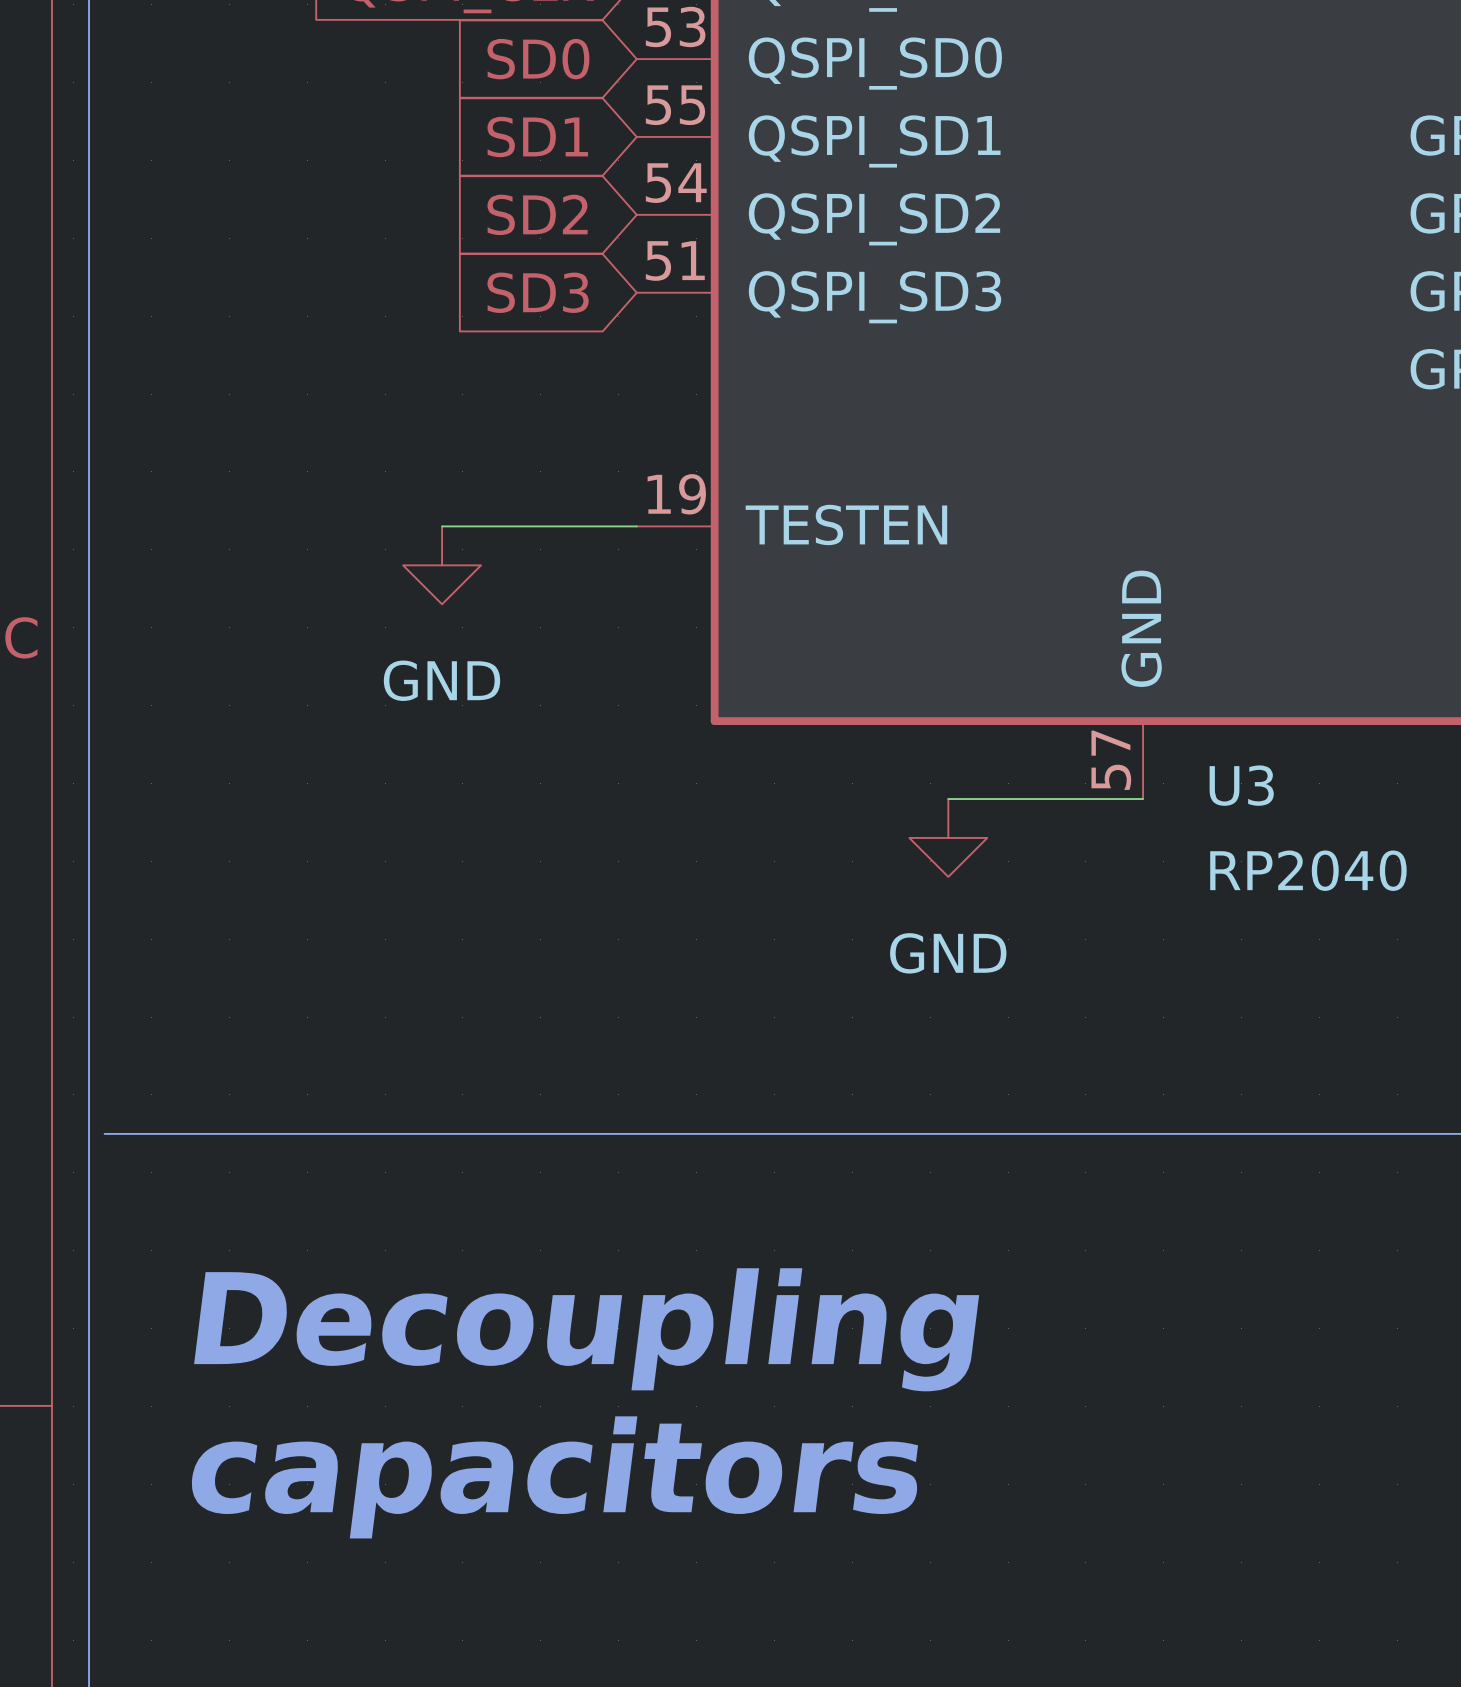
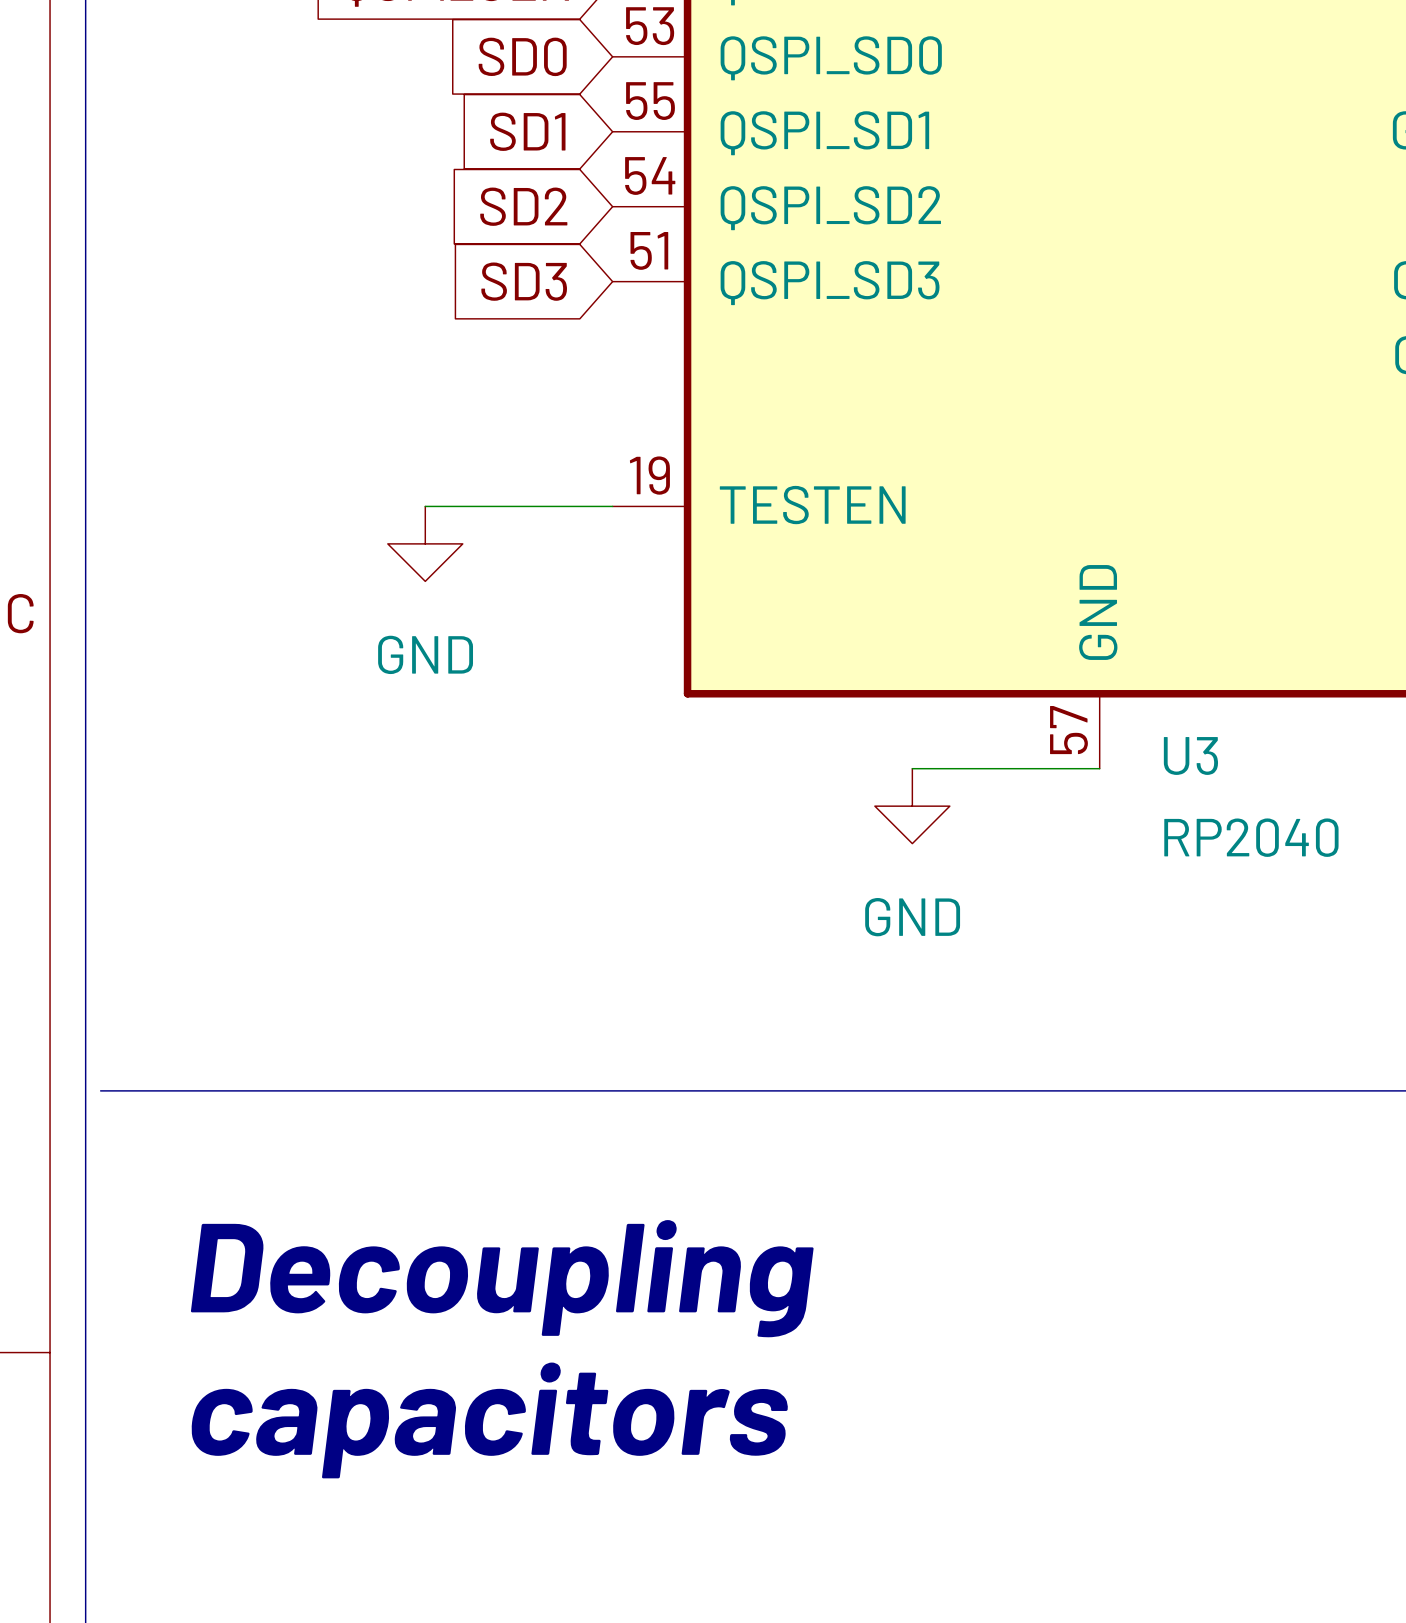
text position: Decoupling (586, 1329) -> Decoupling (502, 1278)
text position: capacitors (554, 1477) -> capacitors (489, 1420)

